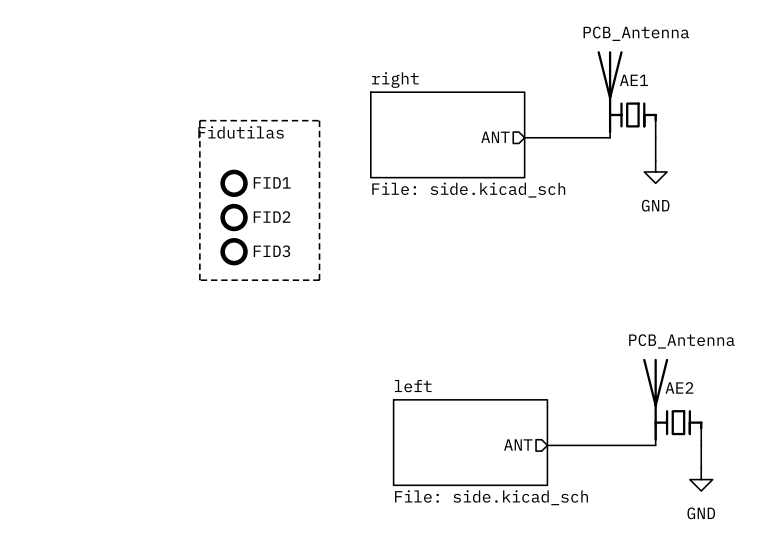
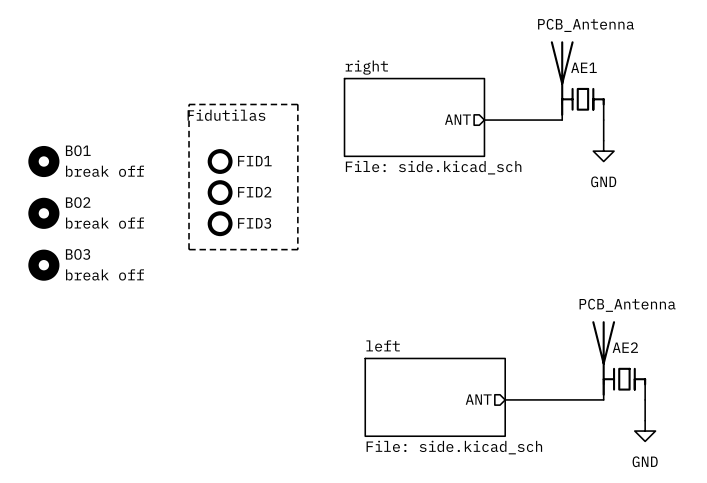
BO1: none -> break off (43, 161)
BO2: none -> break off (43, 213)
BO3: none -> break off (43, 265)

